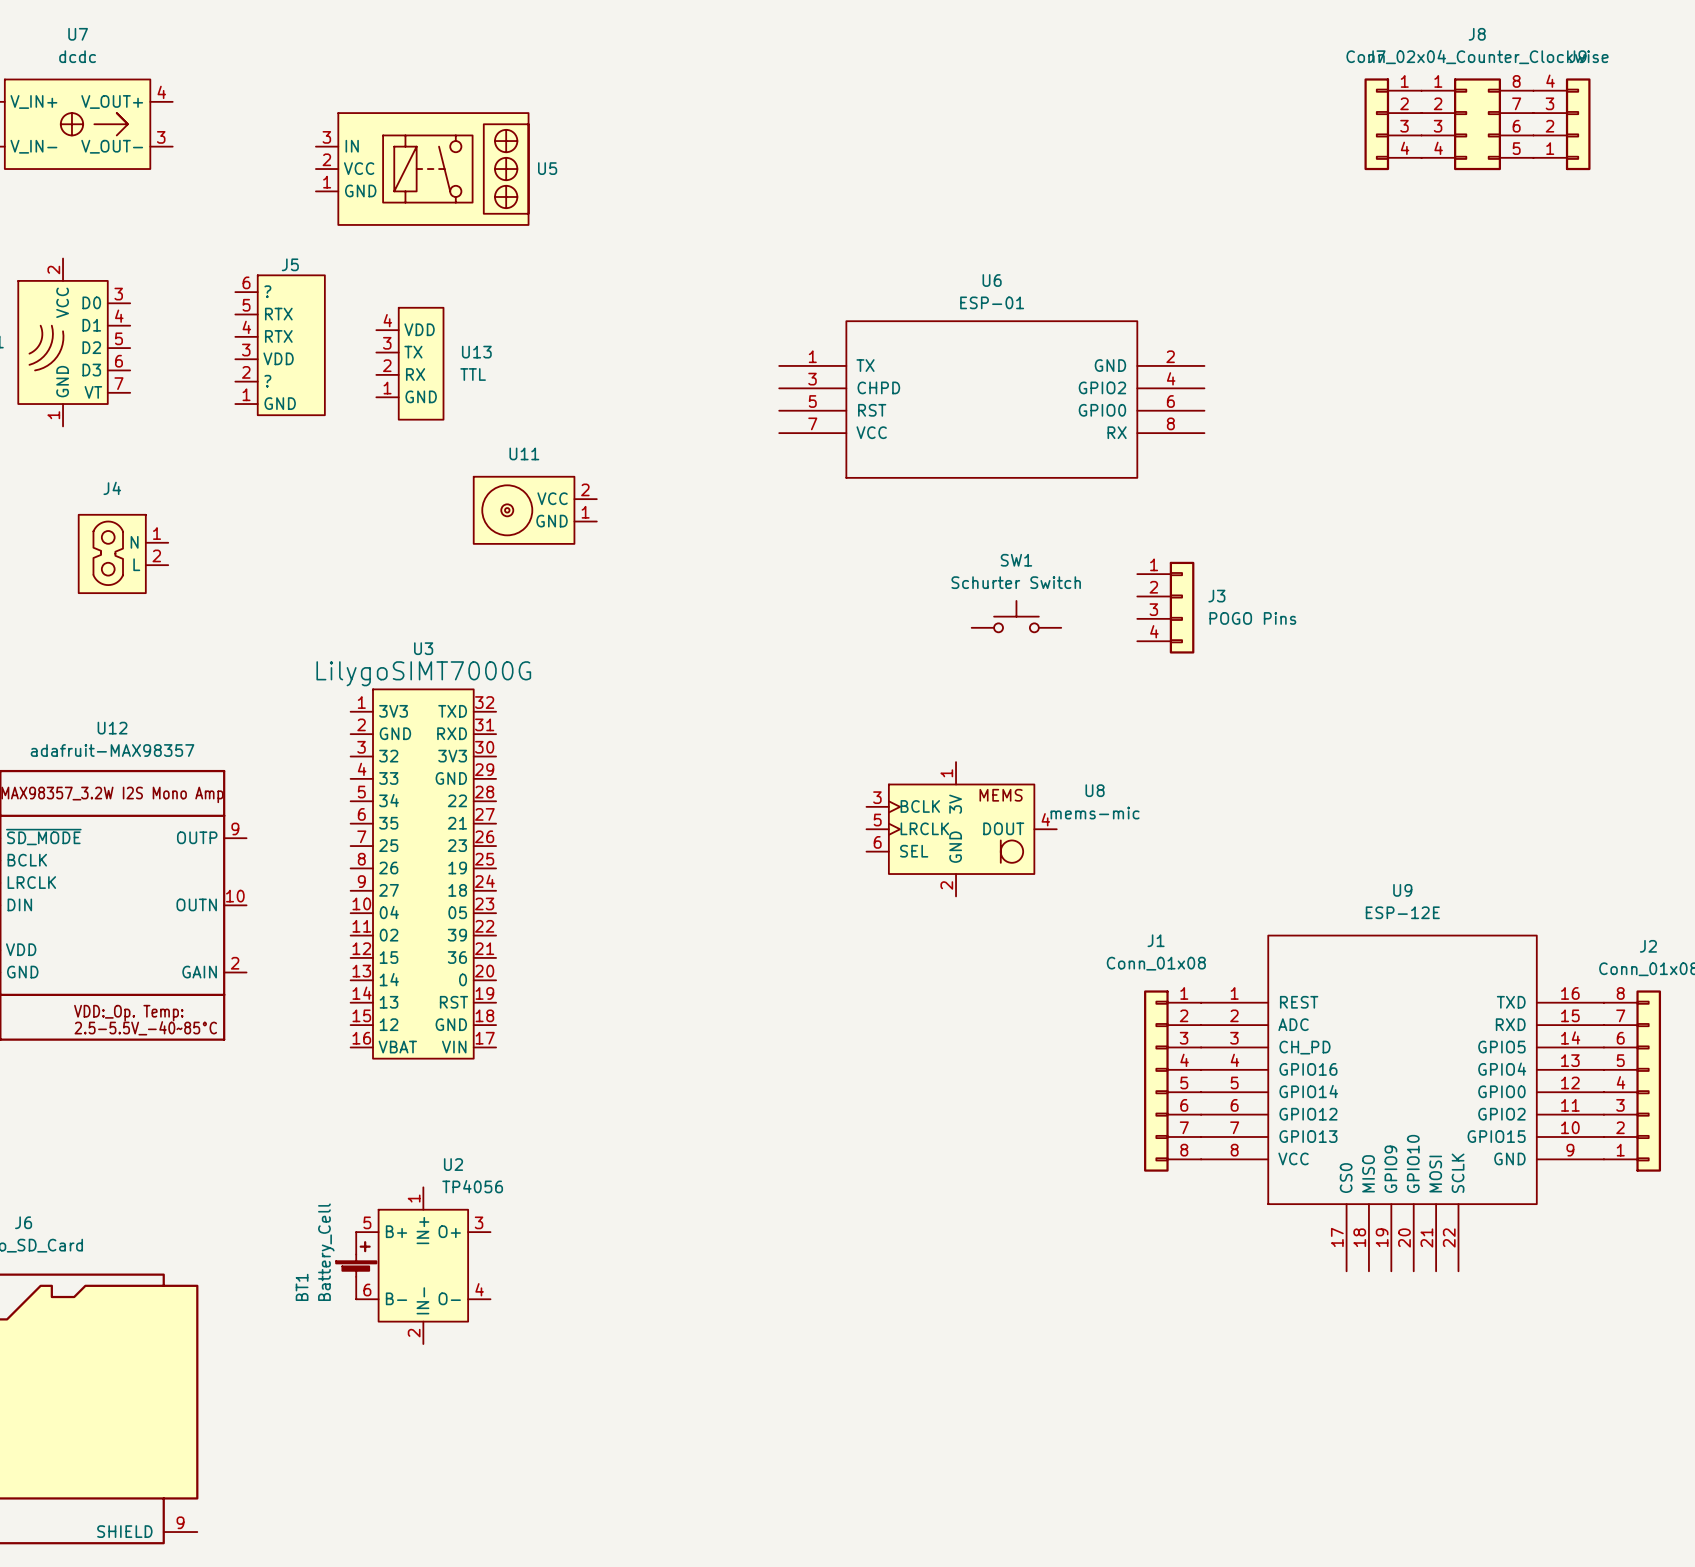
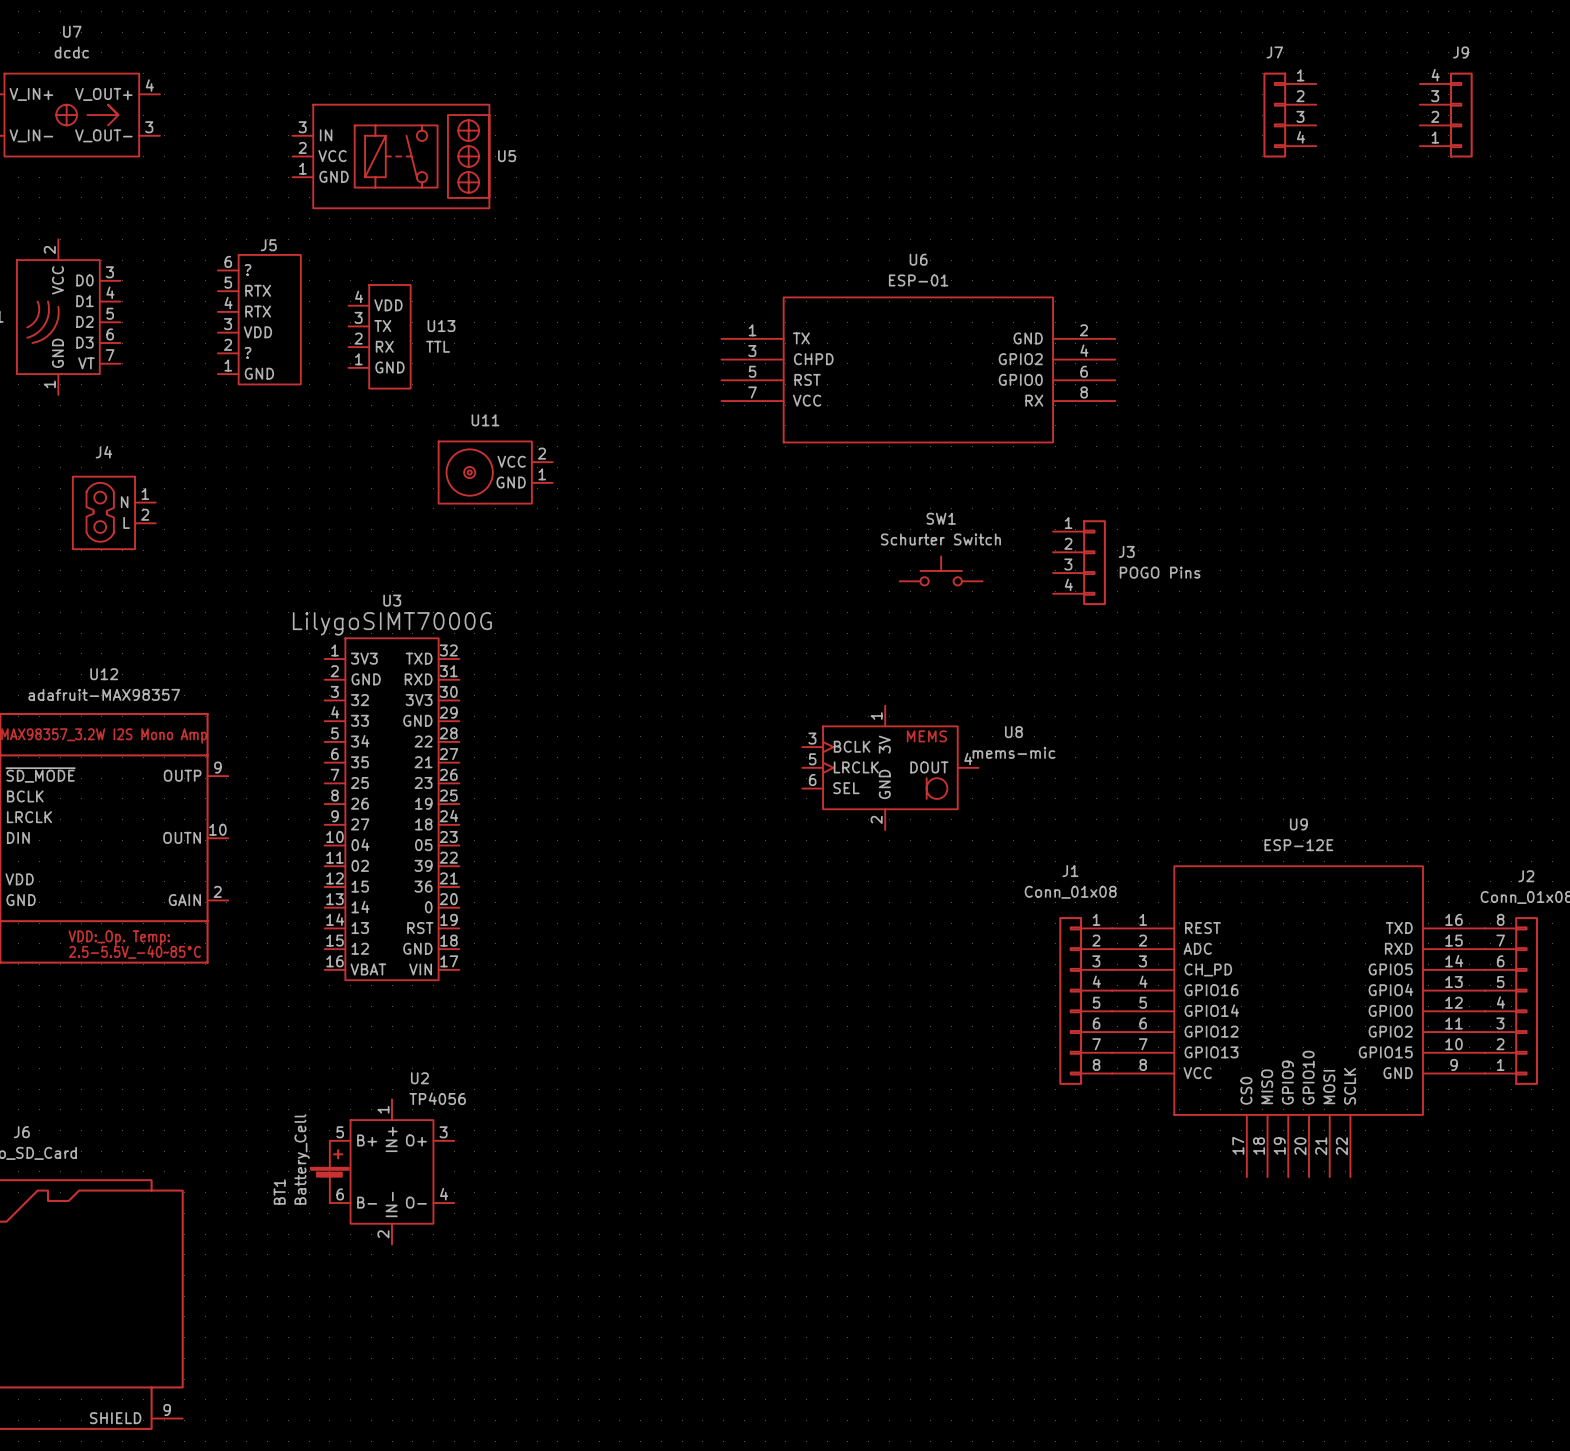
J8: Conn_02x04_Counter_Clockwise (1477, 124) -> none

